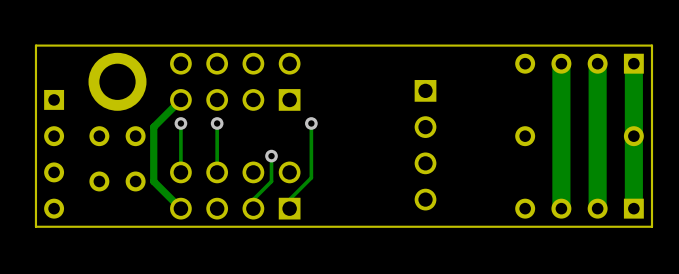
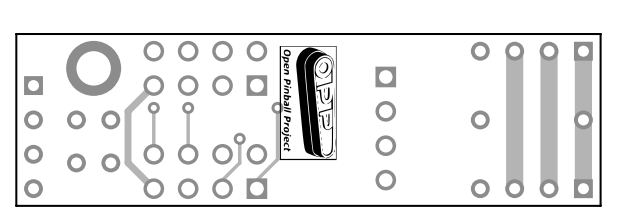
drawing: none -> [279, 46, 337, 161]

